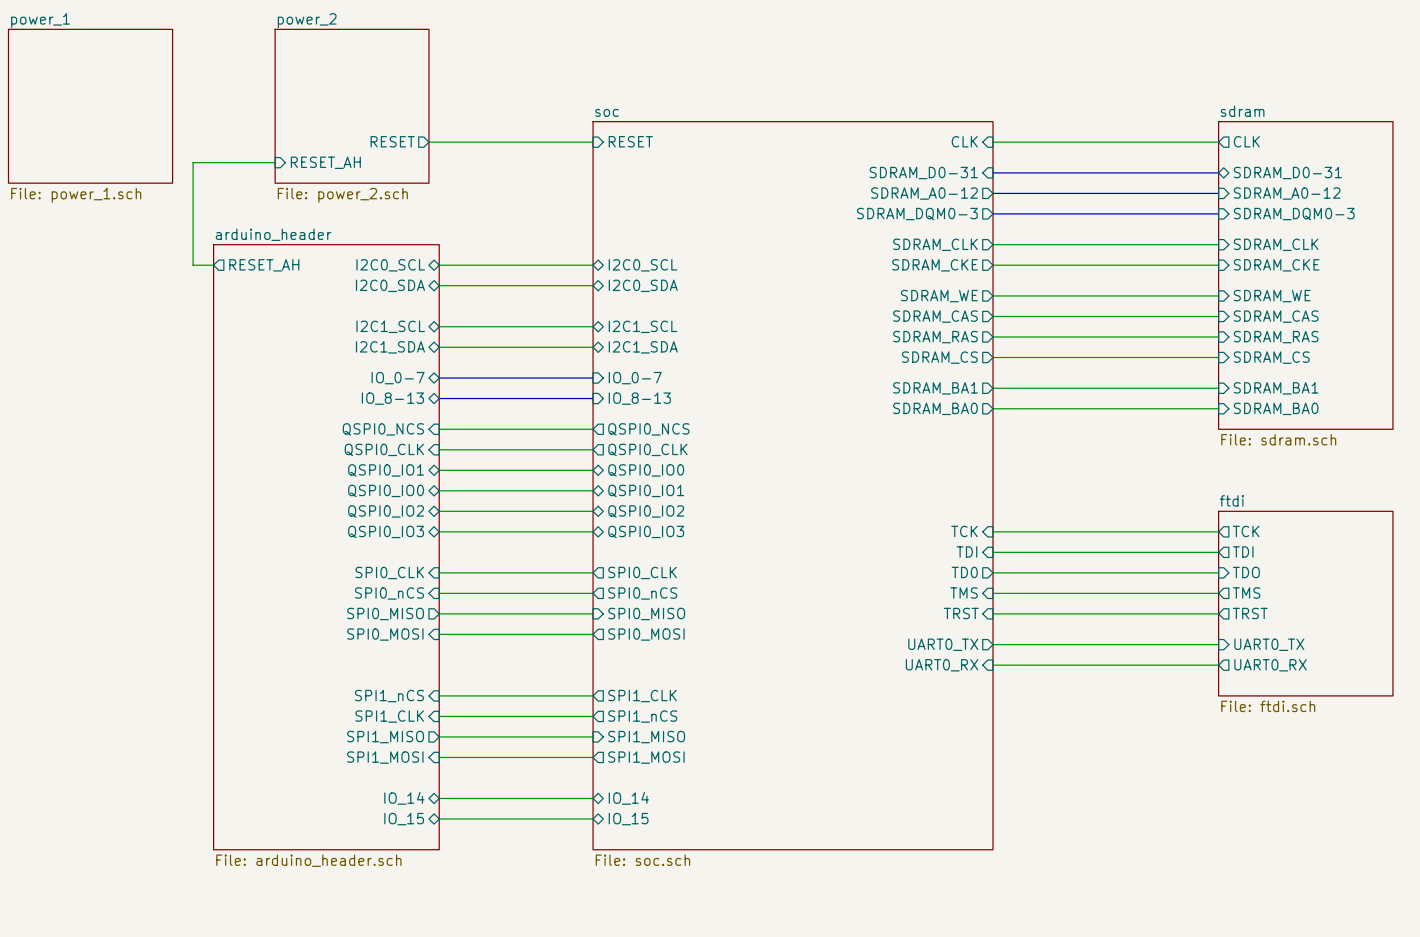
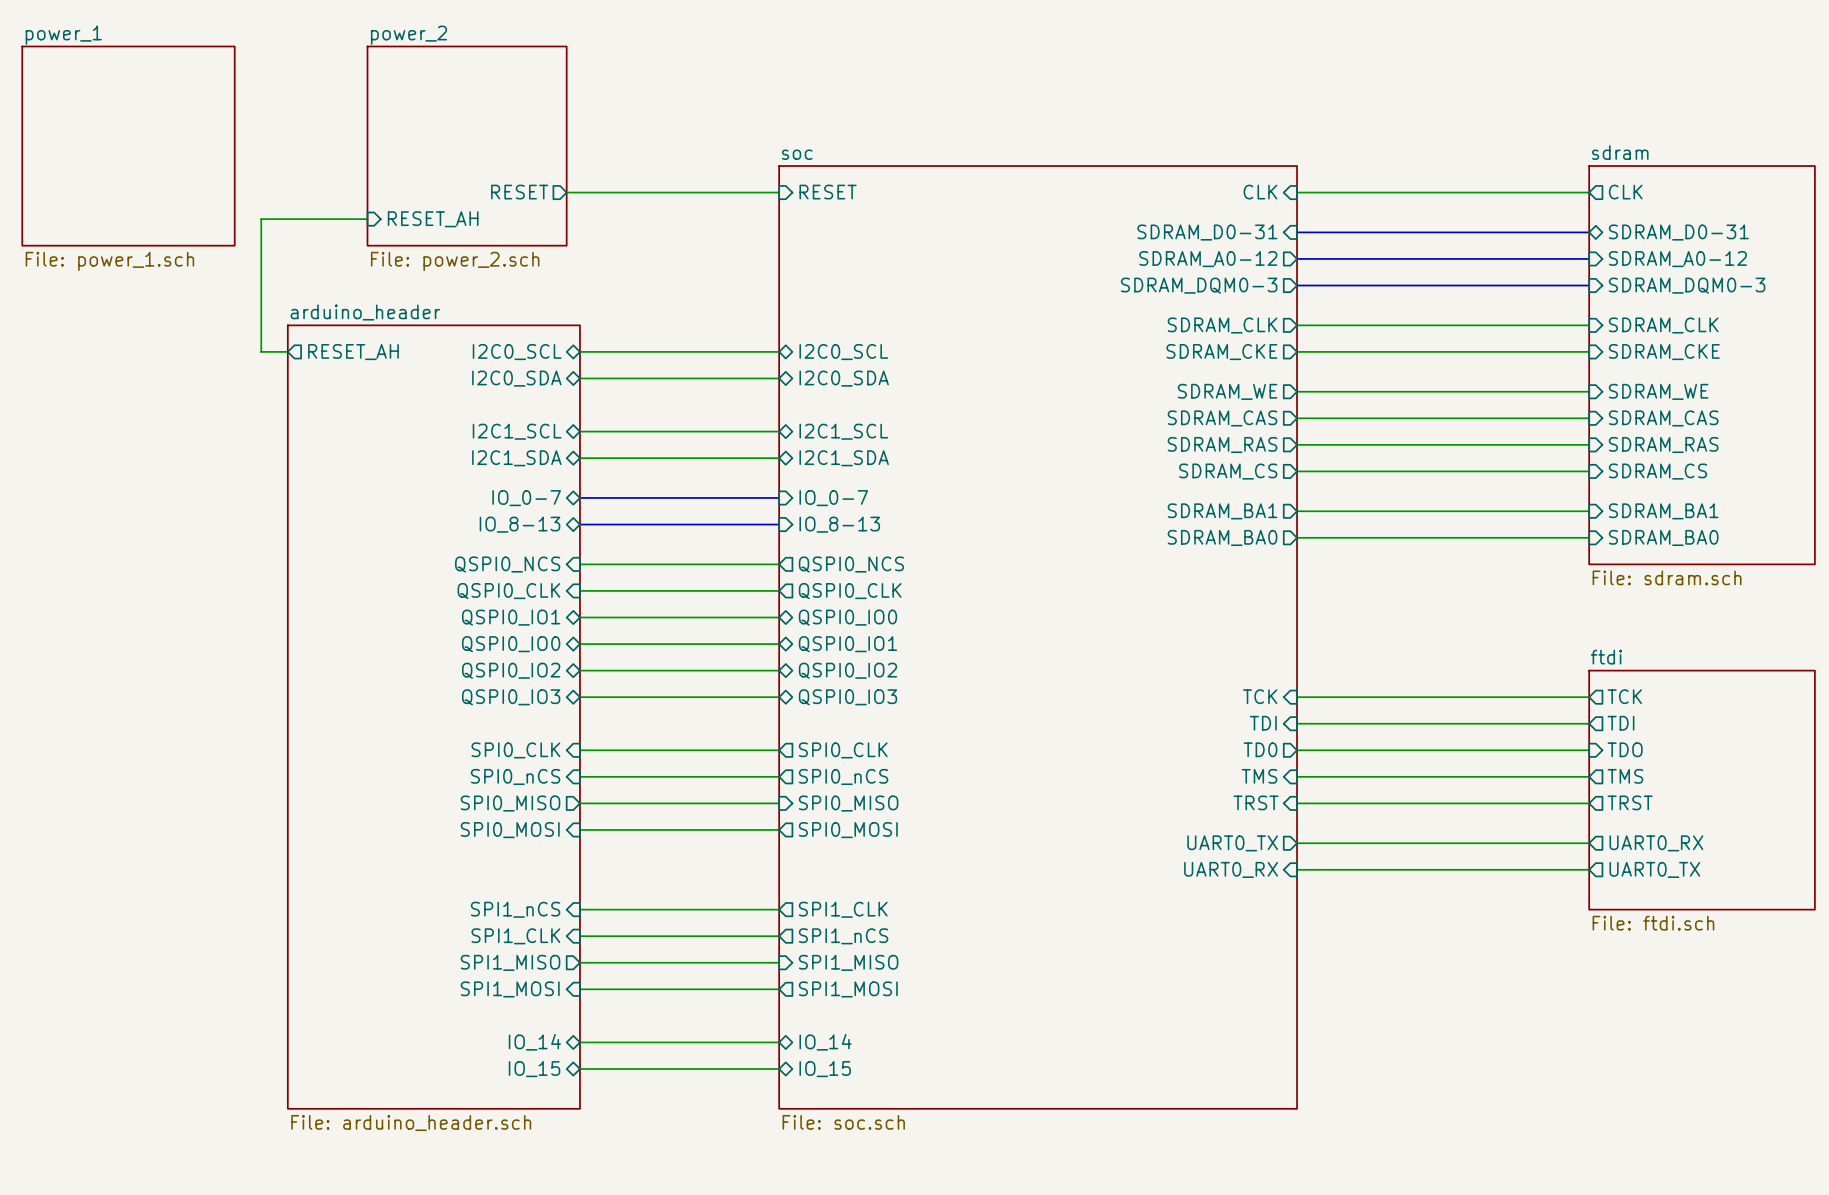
sheet pin shape: input (1269, 644) -> output (1656, 843)
sheet pin: UART0_TX (1269, 644) -> UART0_RX (1656, 843)
sheet pin: UART0_RX (1270, 665) -> UART0_TX (1654, 869)

